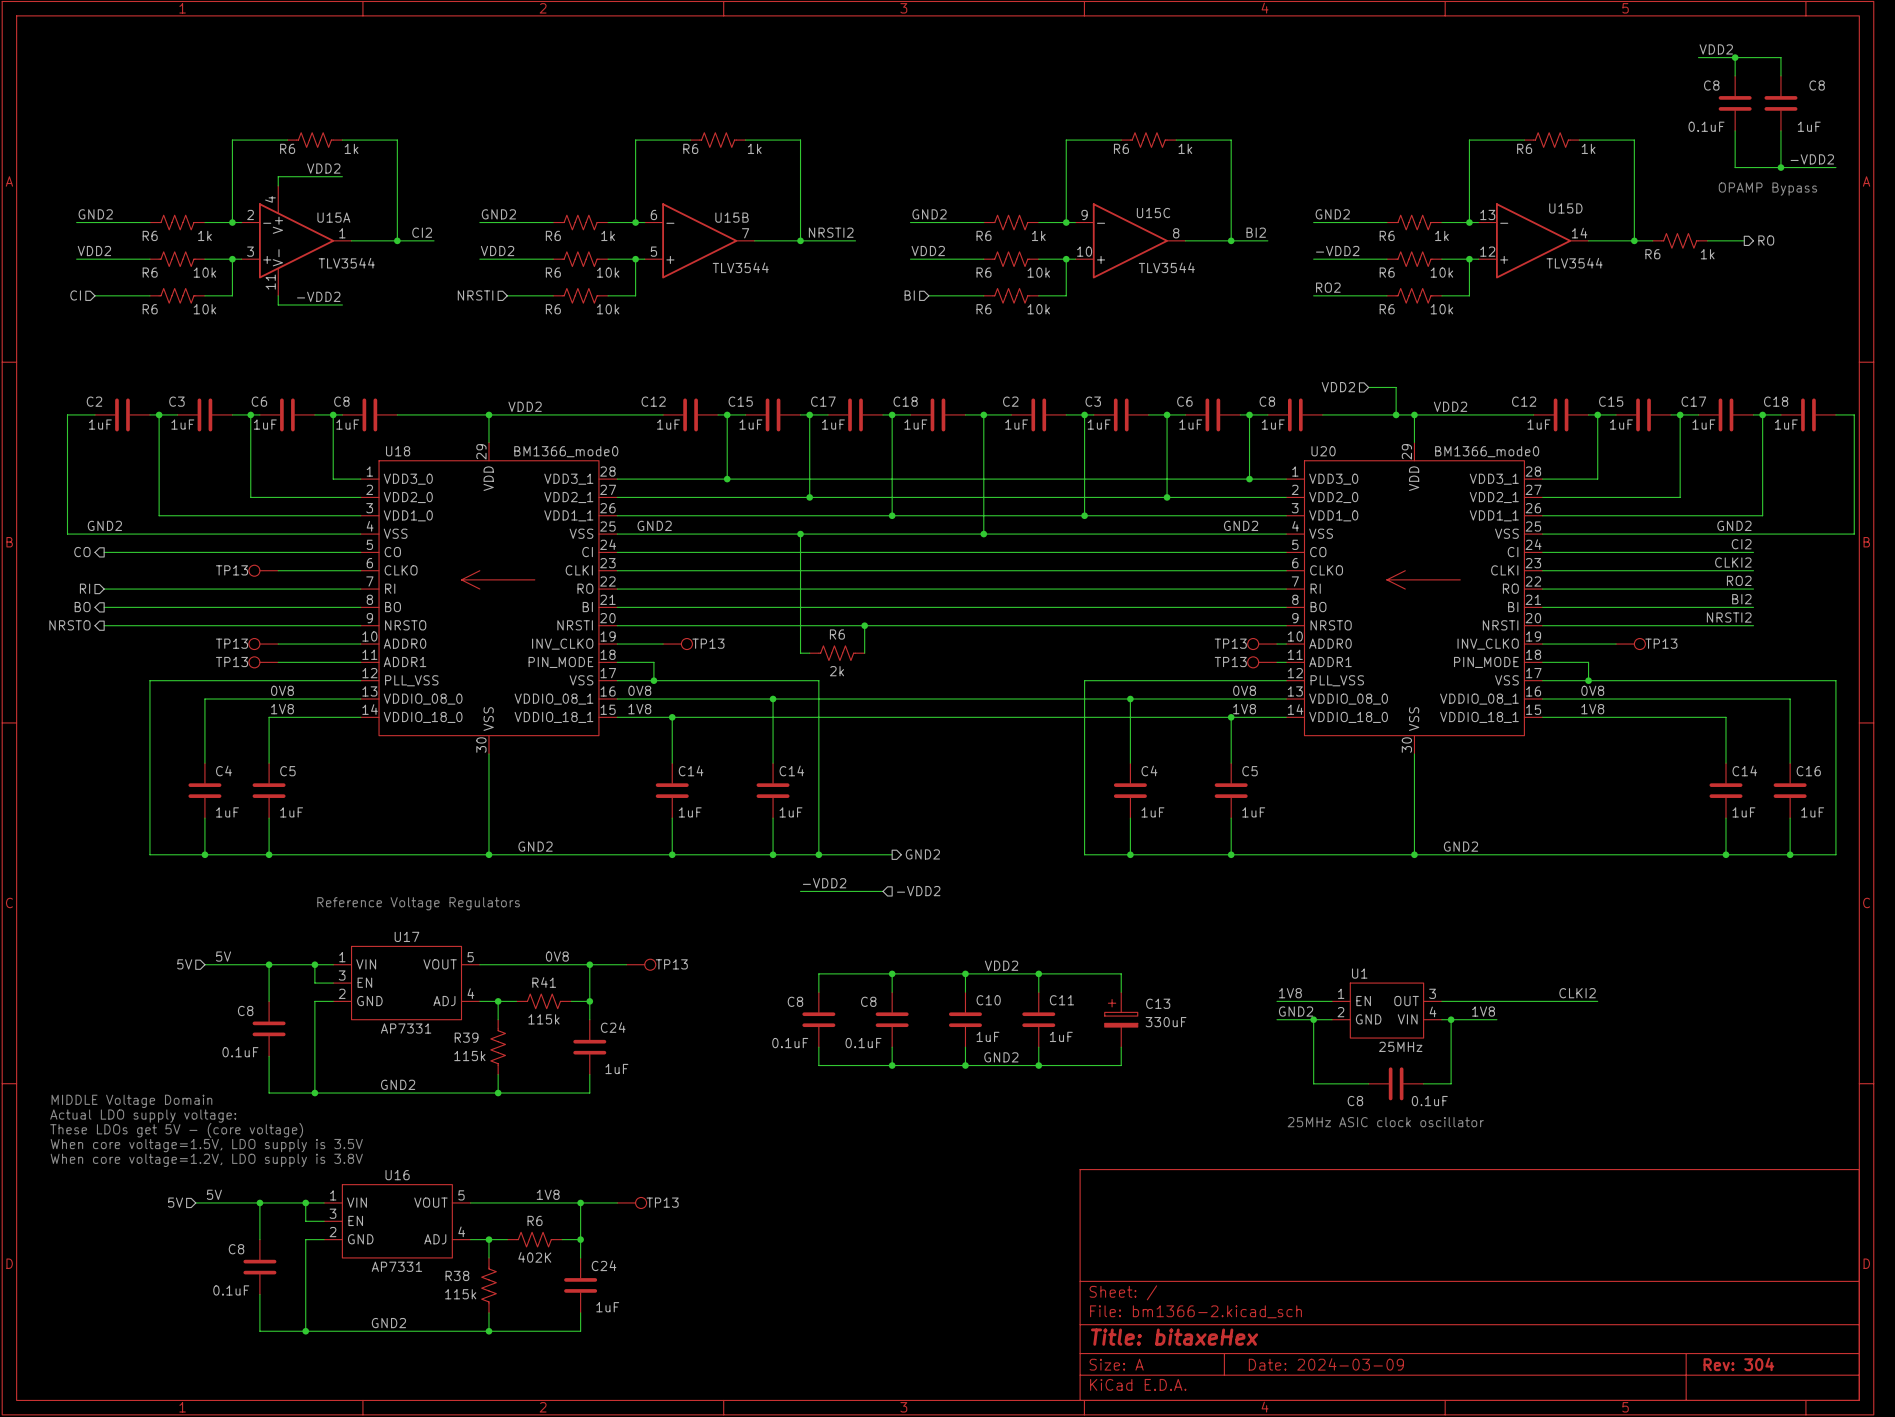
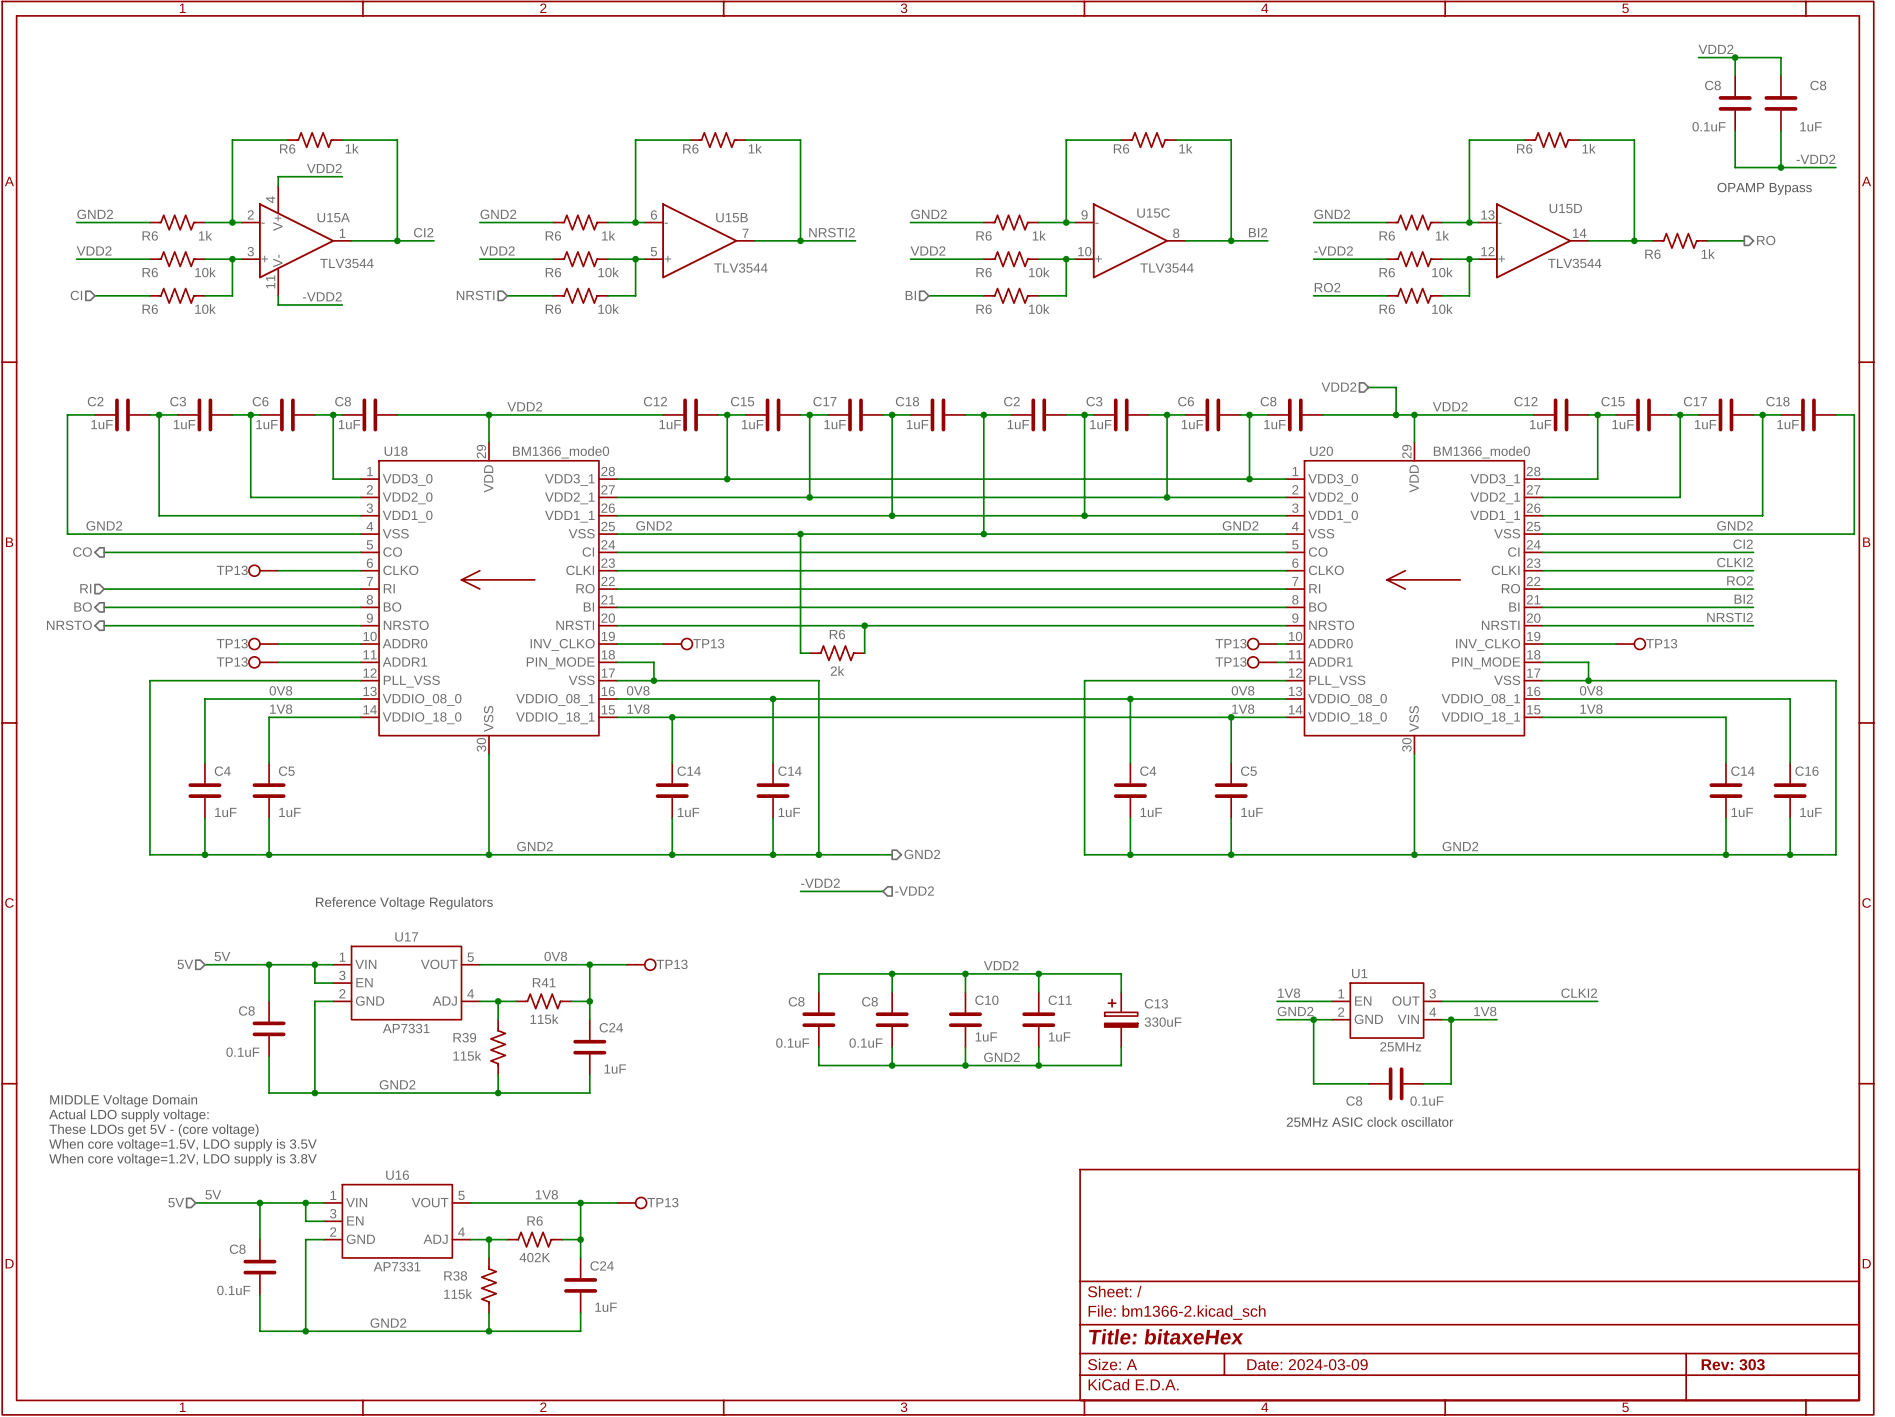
title block: Rev: 304 (1738, 1364) -> Rev: 303 (1733, 1364)

